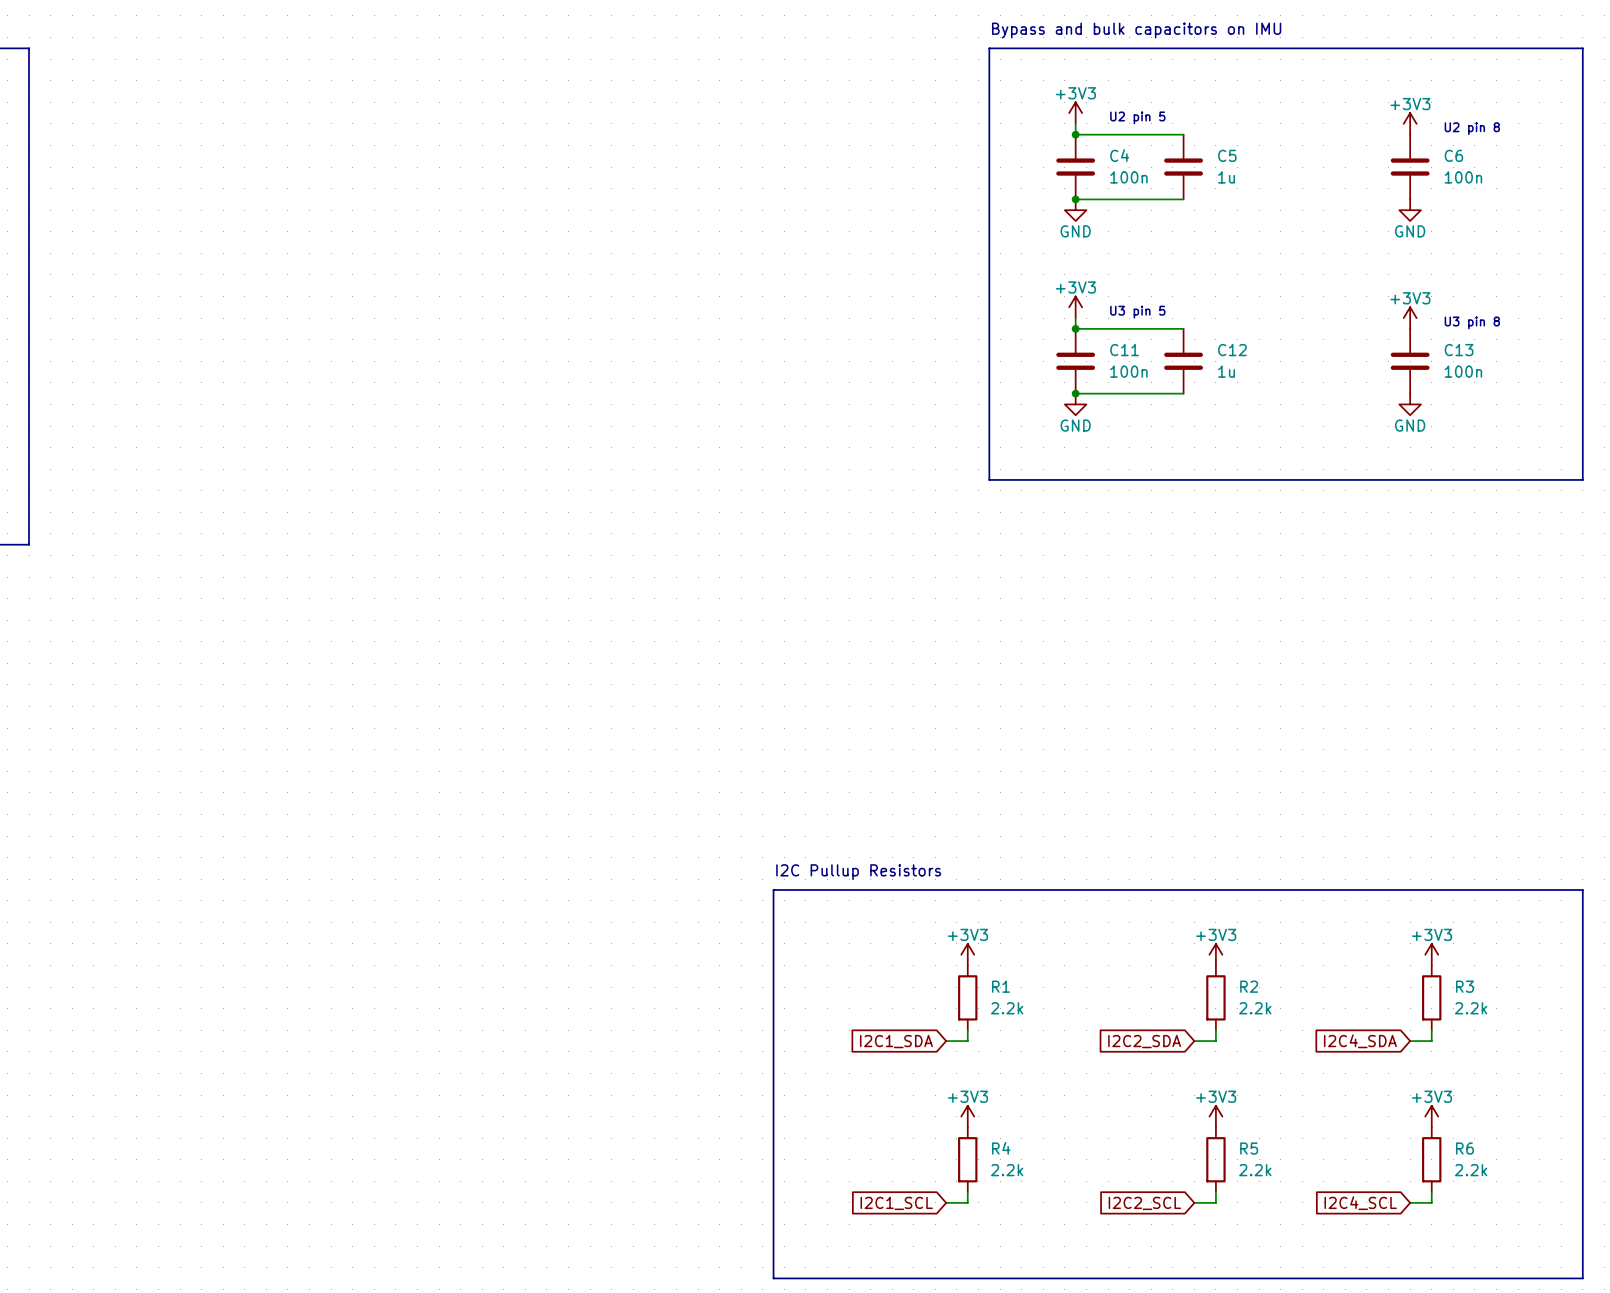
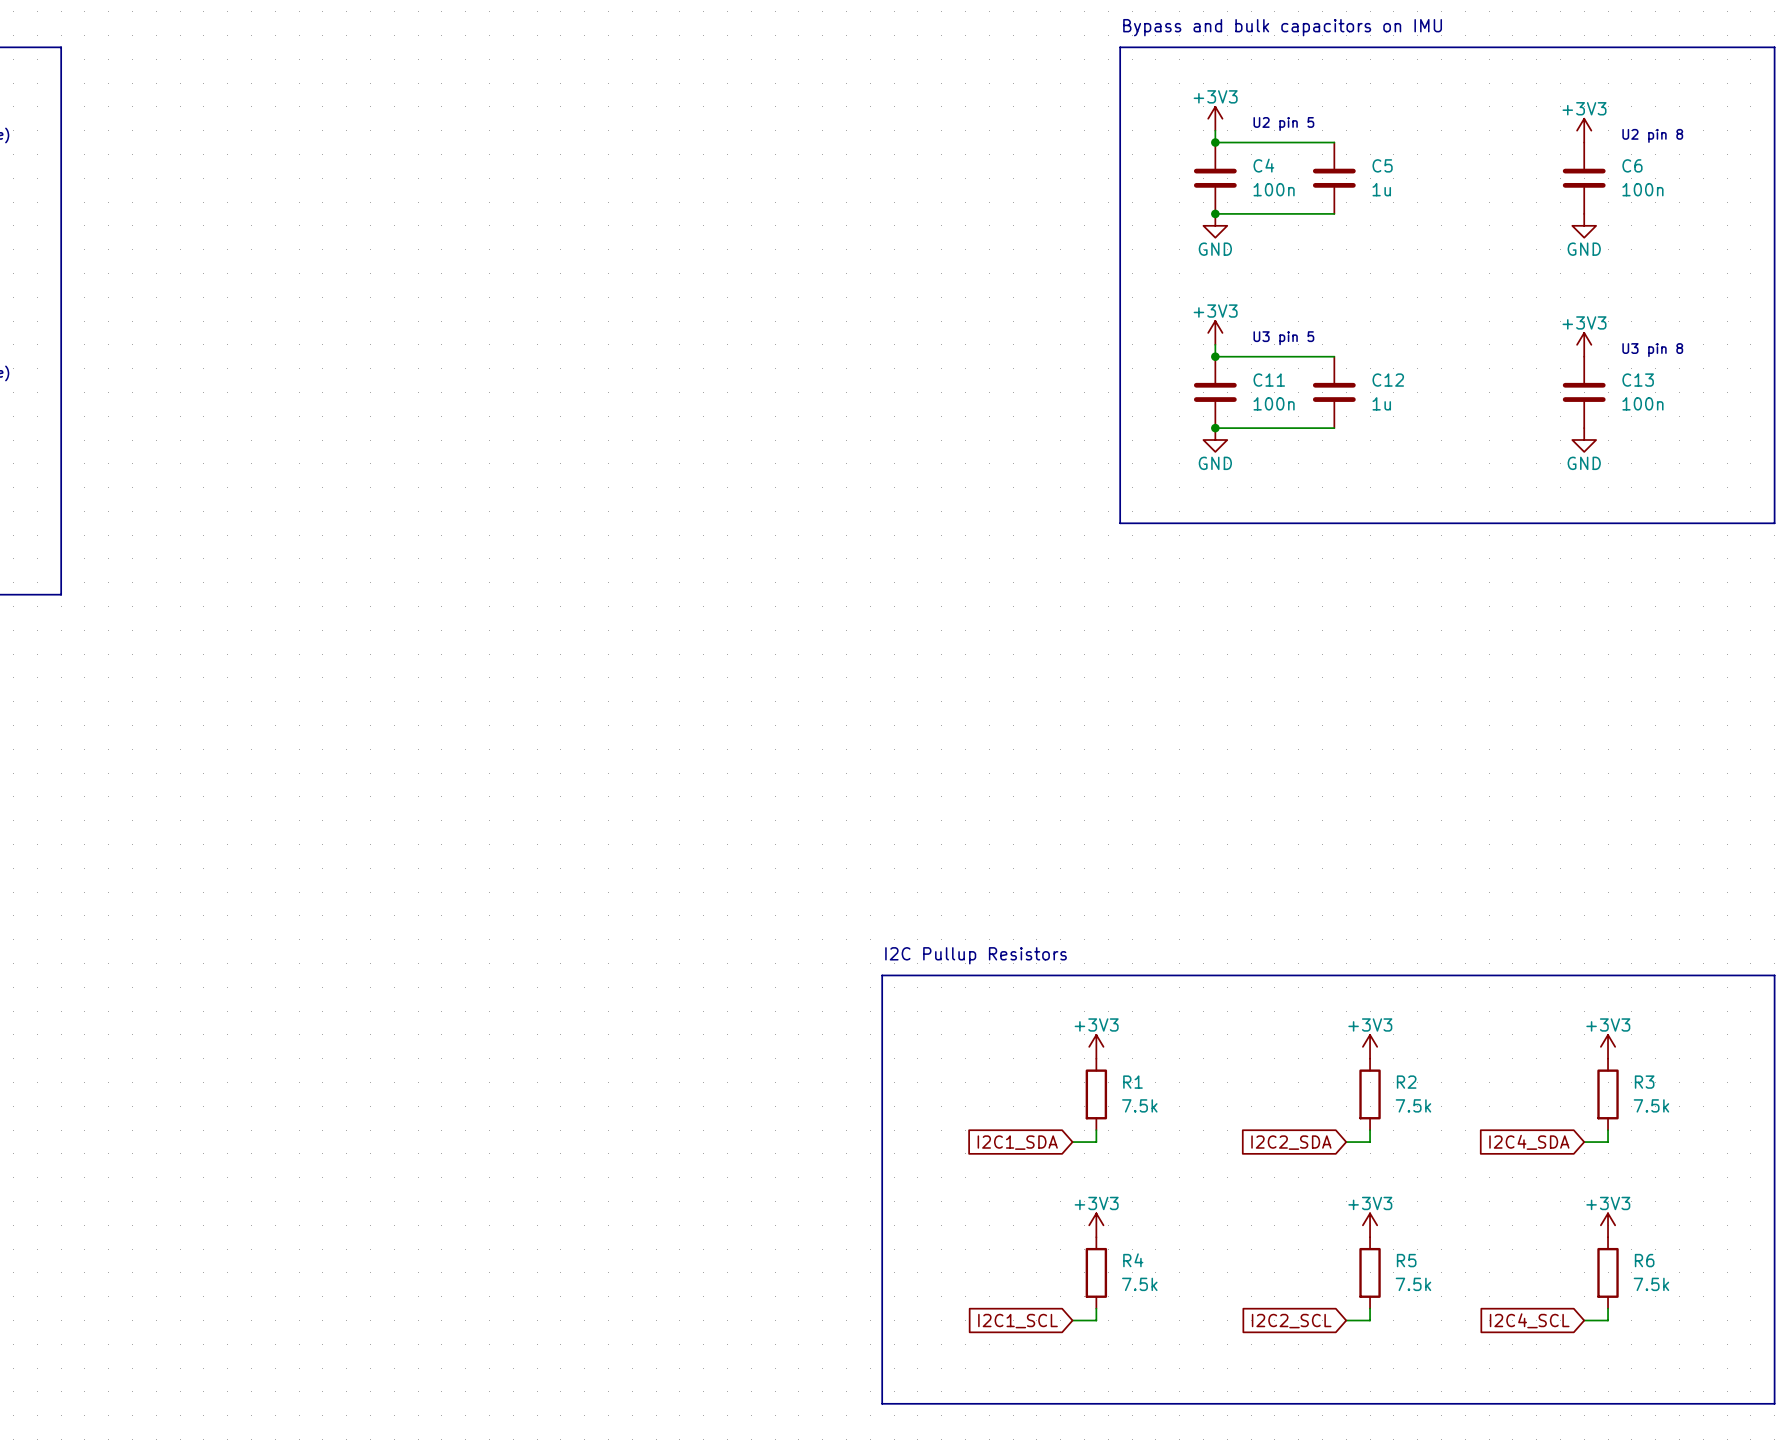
R1 value: 2.2k (1007, 1008) -> 7.5k (1139, 1105)
R2 value: 2.2k (1255, 1008) -> 7.5k (1413, 1105)
R3 value: 2.2k (1471, 1008) -> 7.5k (1651, 1105)
R4 value: 2.2k (1007, 1170) -> 7.5k (1139, 1284)
R5 value: 2.2k (1255, 1170) -> 7.5k (1413, 1284)
R6 value: 2.2k (1471, 1170) -> 7.5k (1651, 1284)

